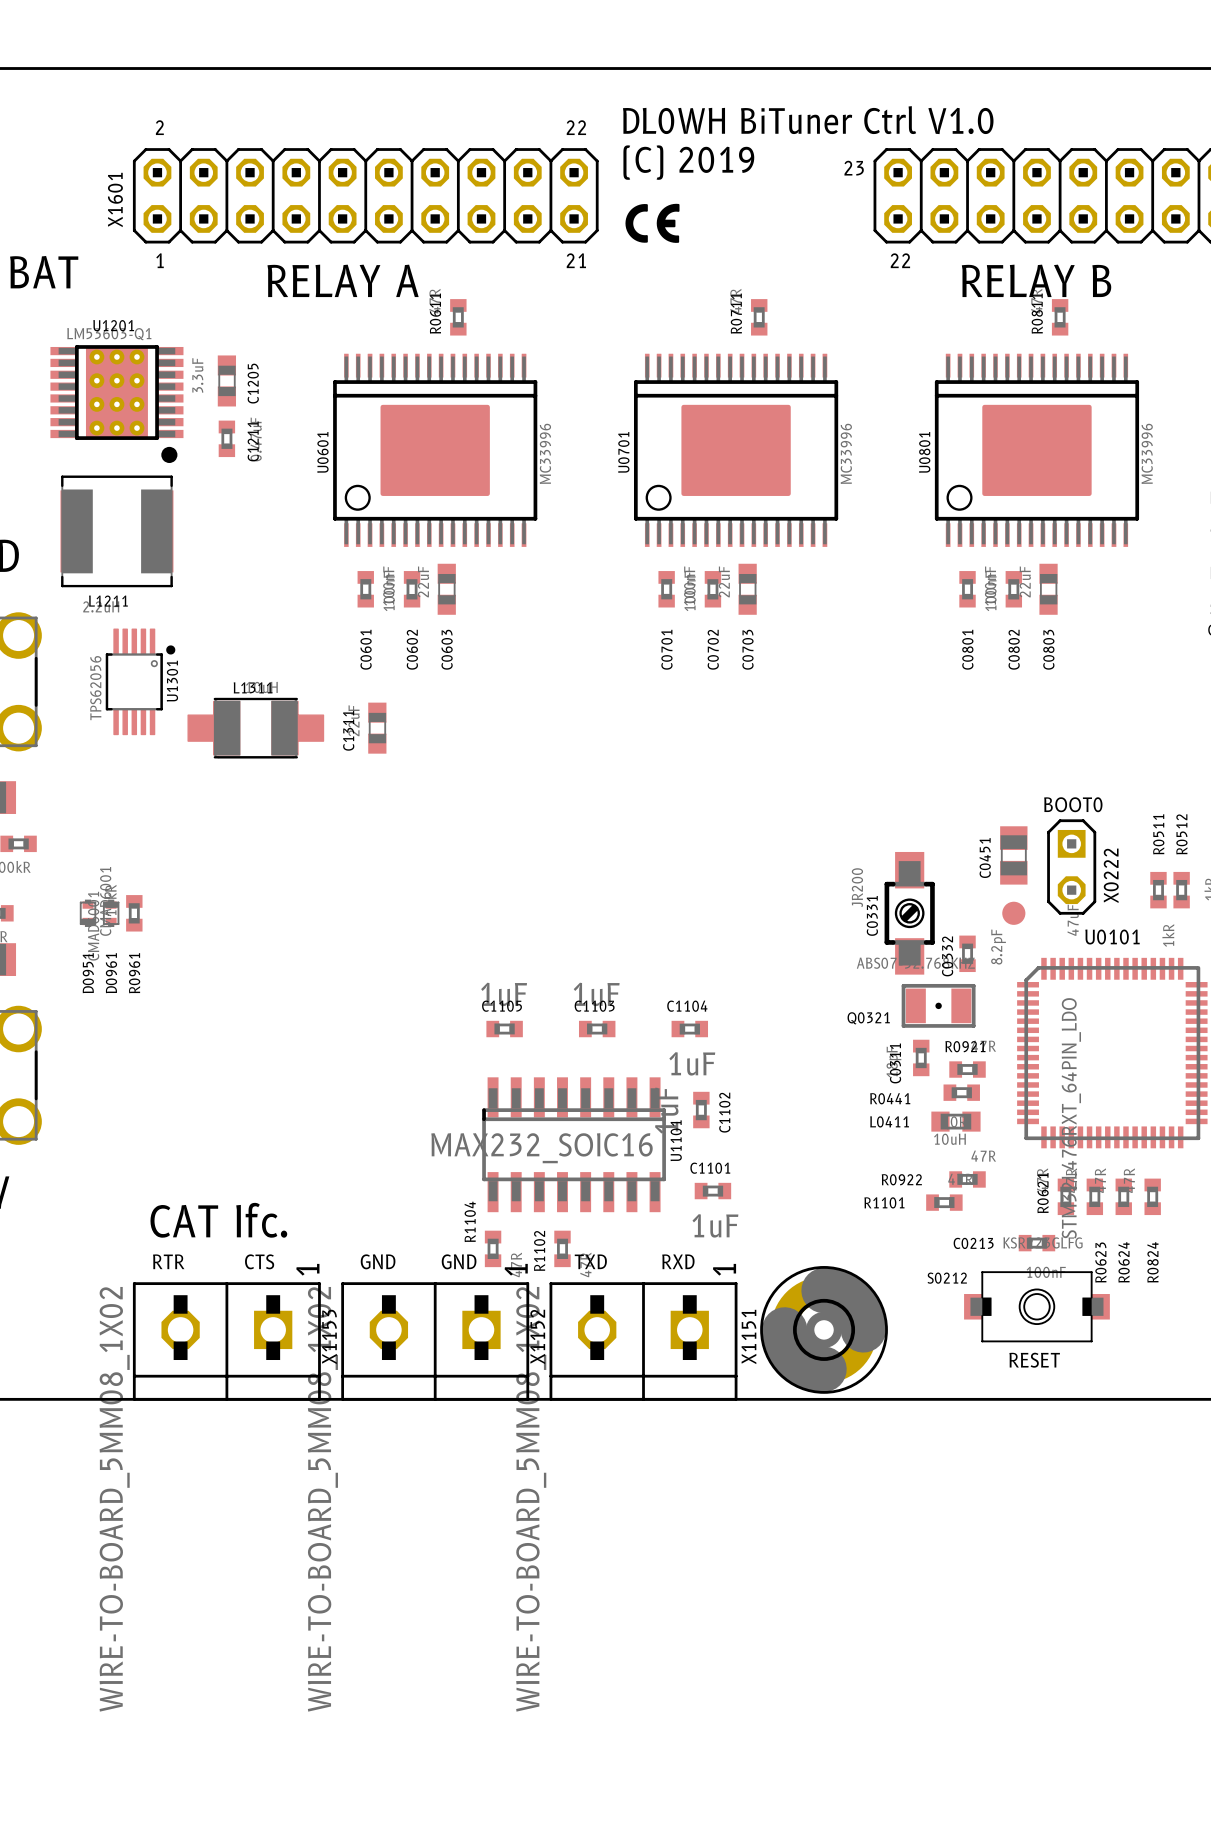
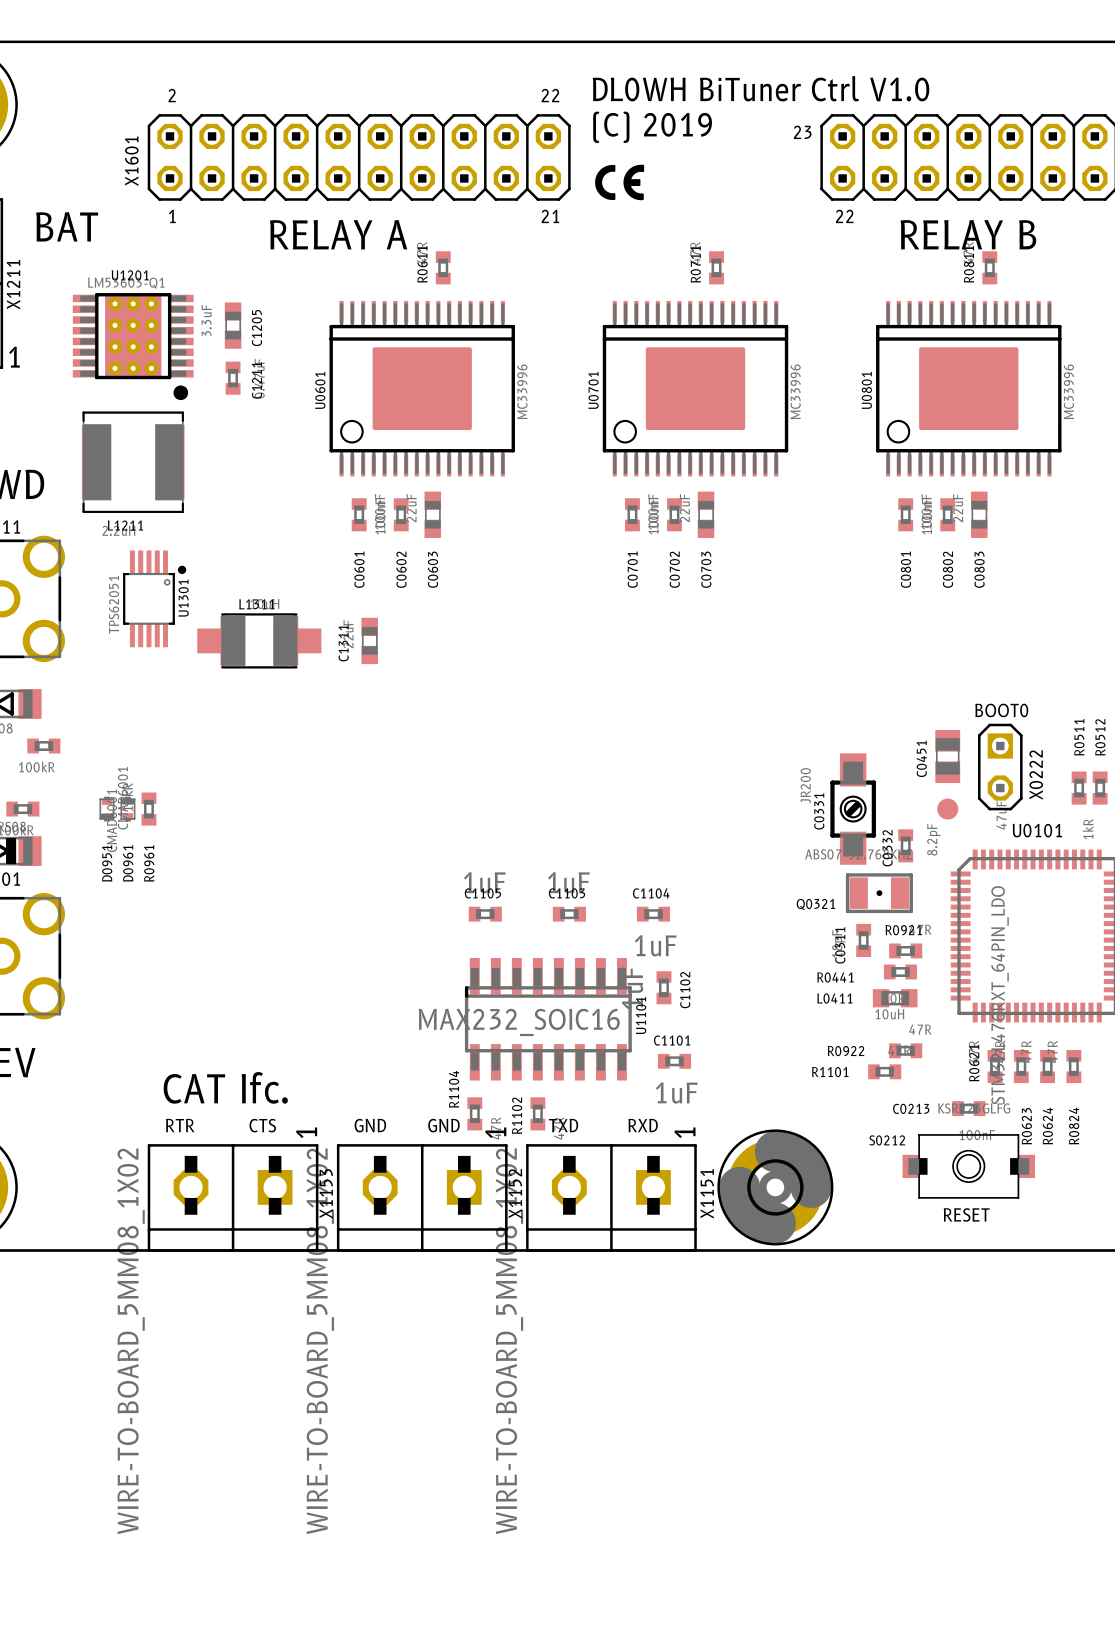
U1301 value: TPS62056 (95, 688) -> TPS62051 (114, 604)

